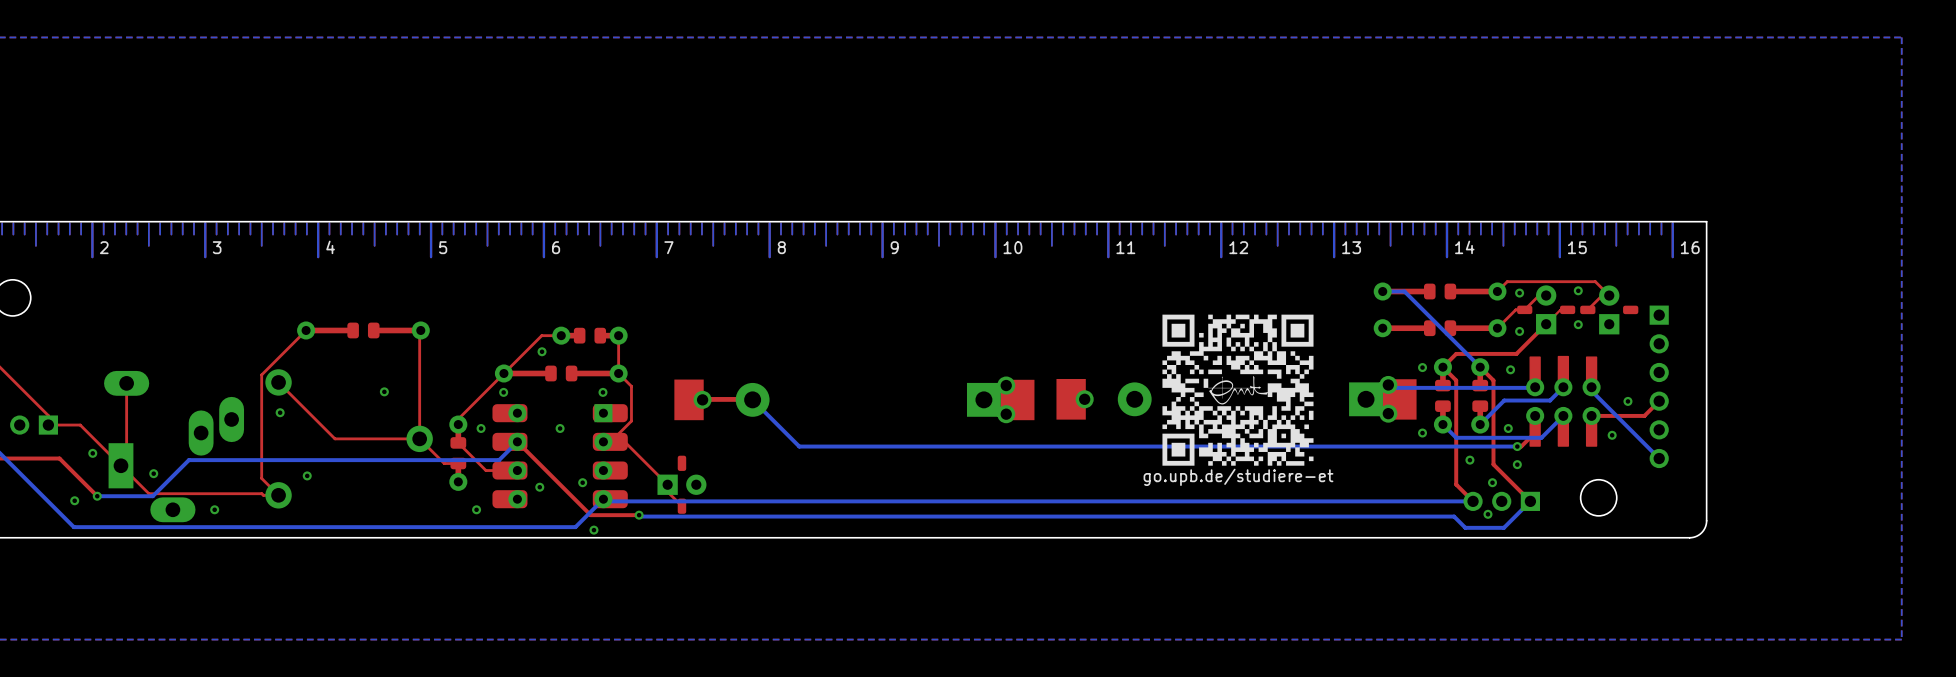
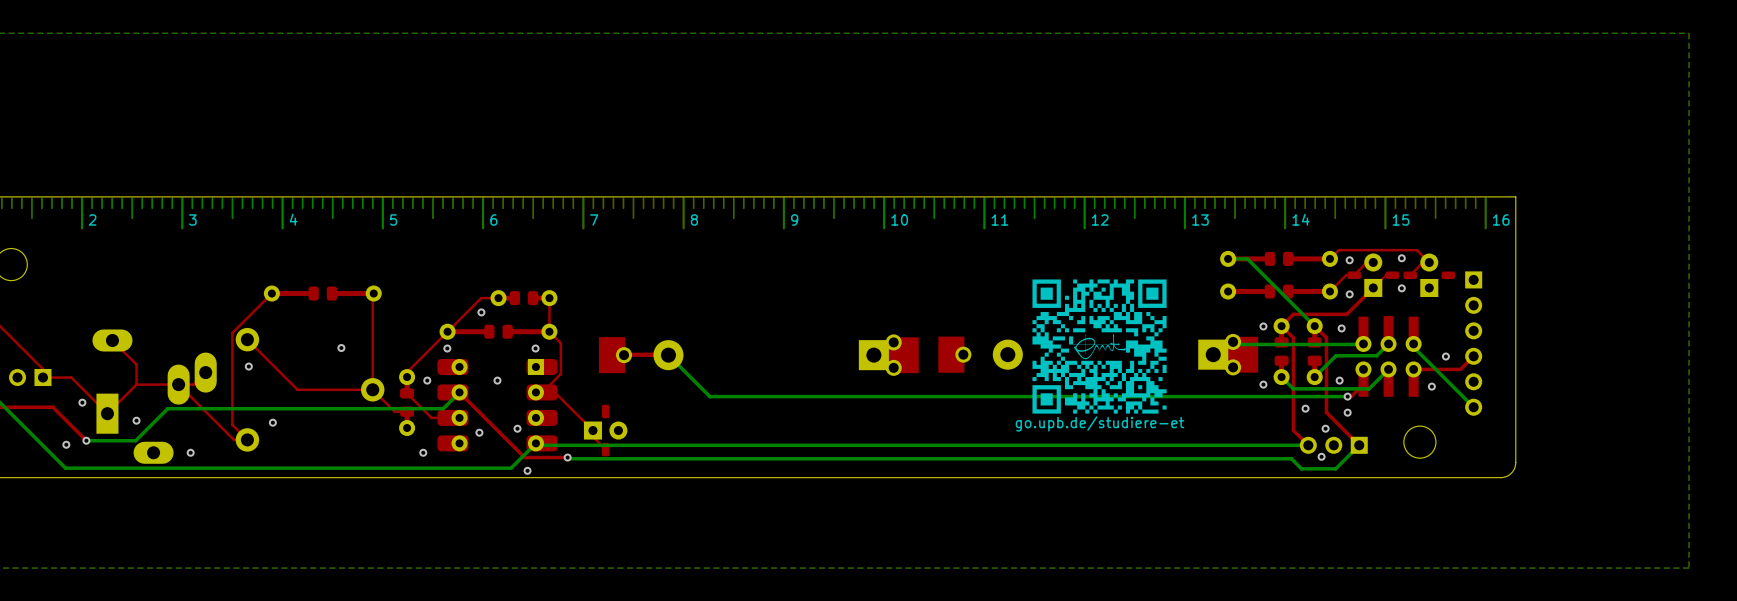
top track: (126, 383) (126, 460) -> (112, 340) (136, 364) (136, 384)
top track: none -> (205, 372) (193, 384) (136, 384)
top track: none -> (136, 384) (112, 408)
top track: (120, 465) (148, 493) (261, 493) -> (178, 384) (232, 438)

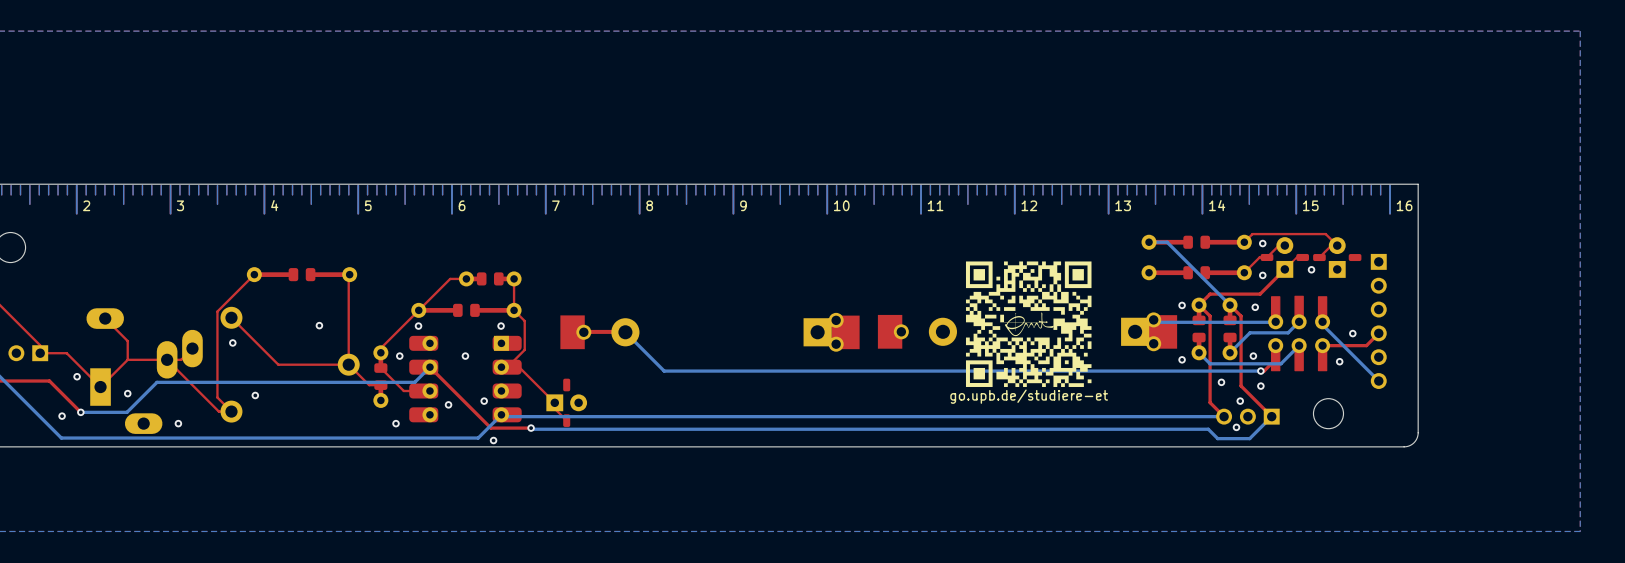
via: (1401, 258) -> none
via: (481, 312) -> none

